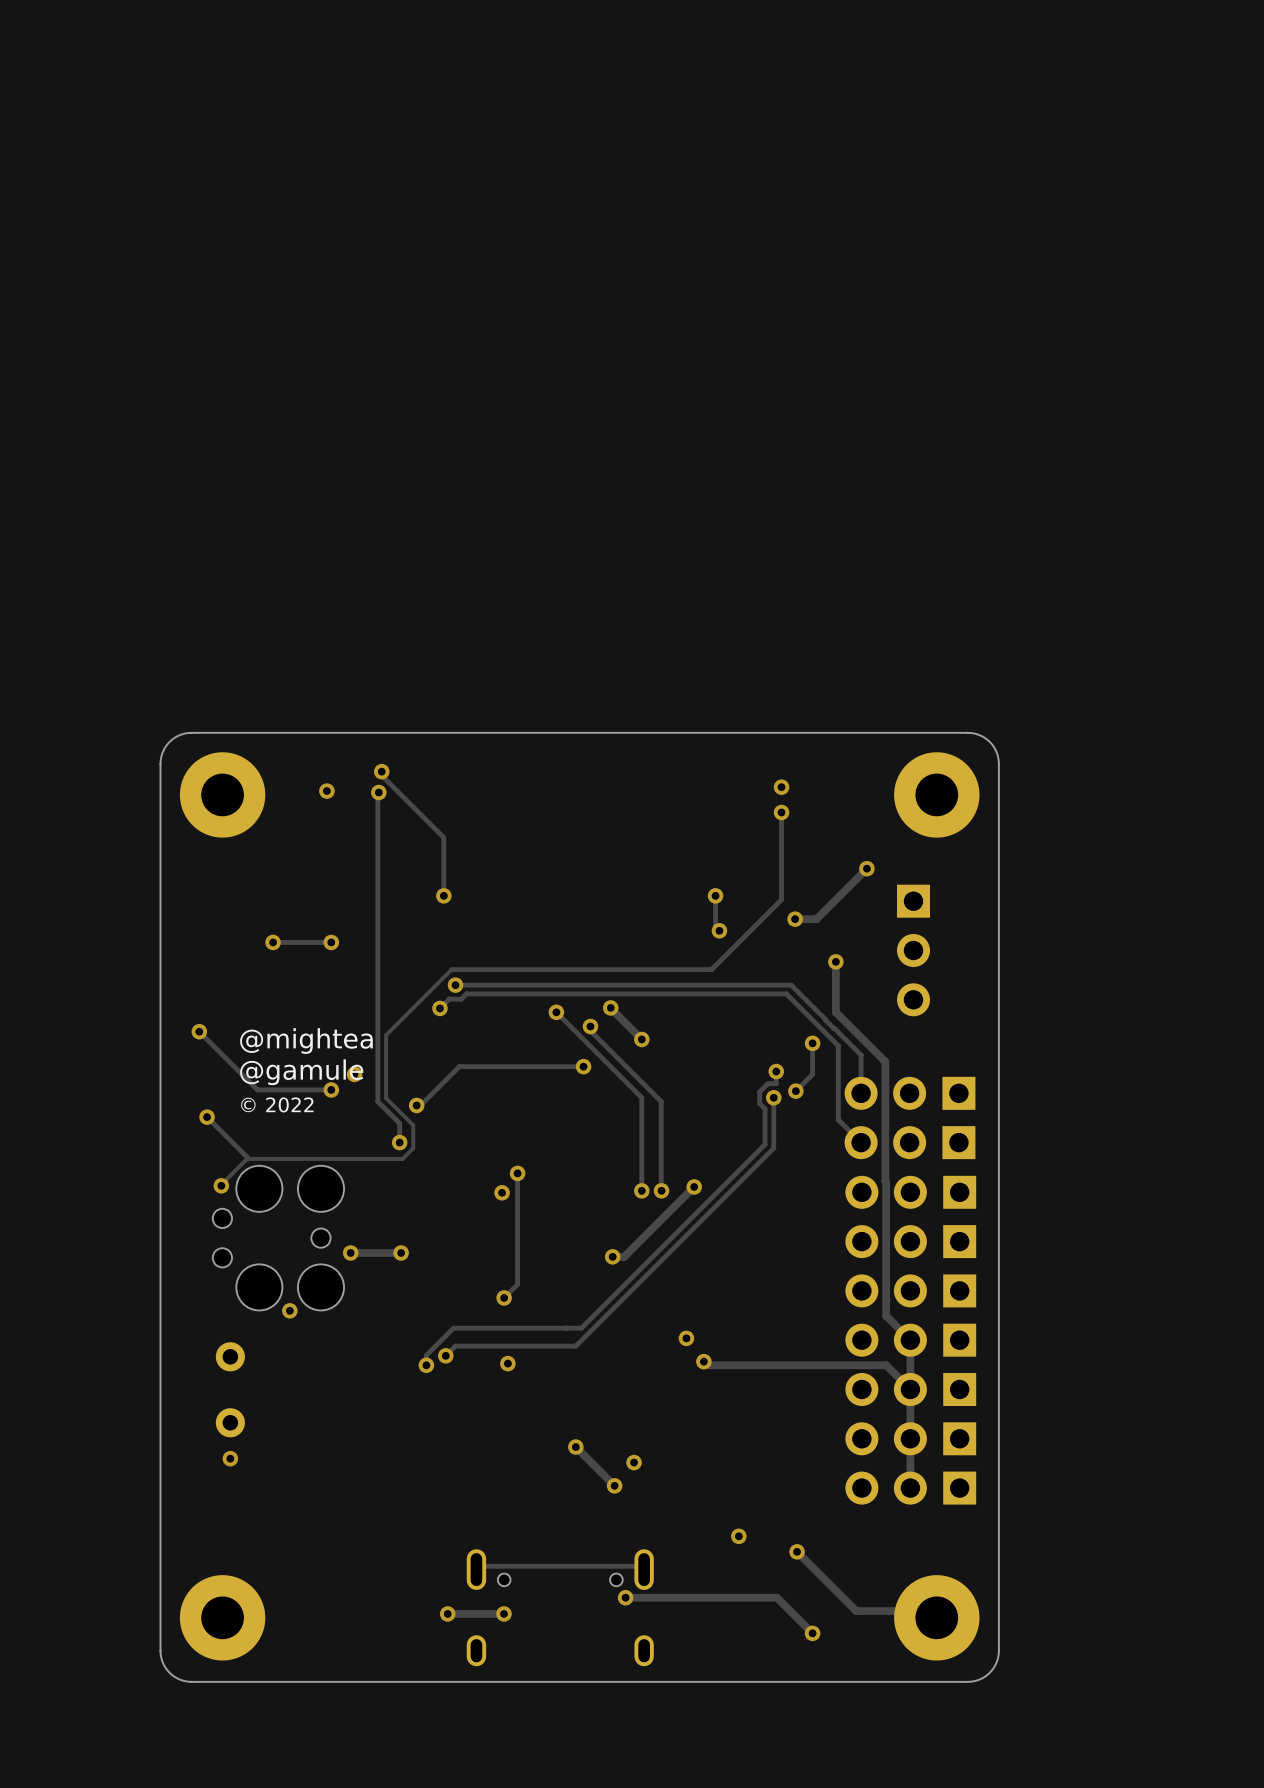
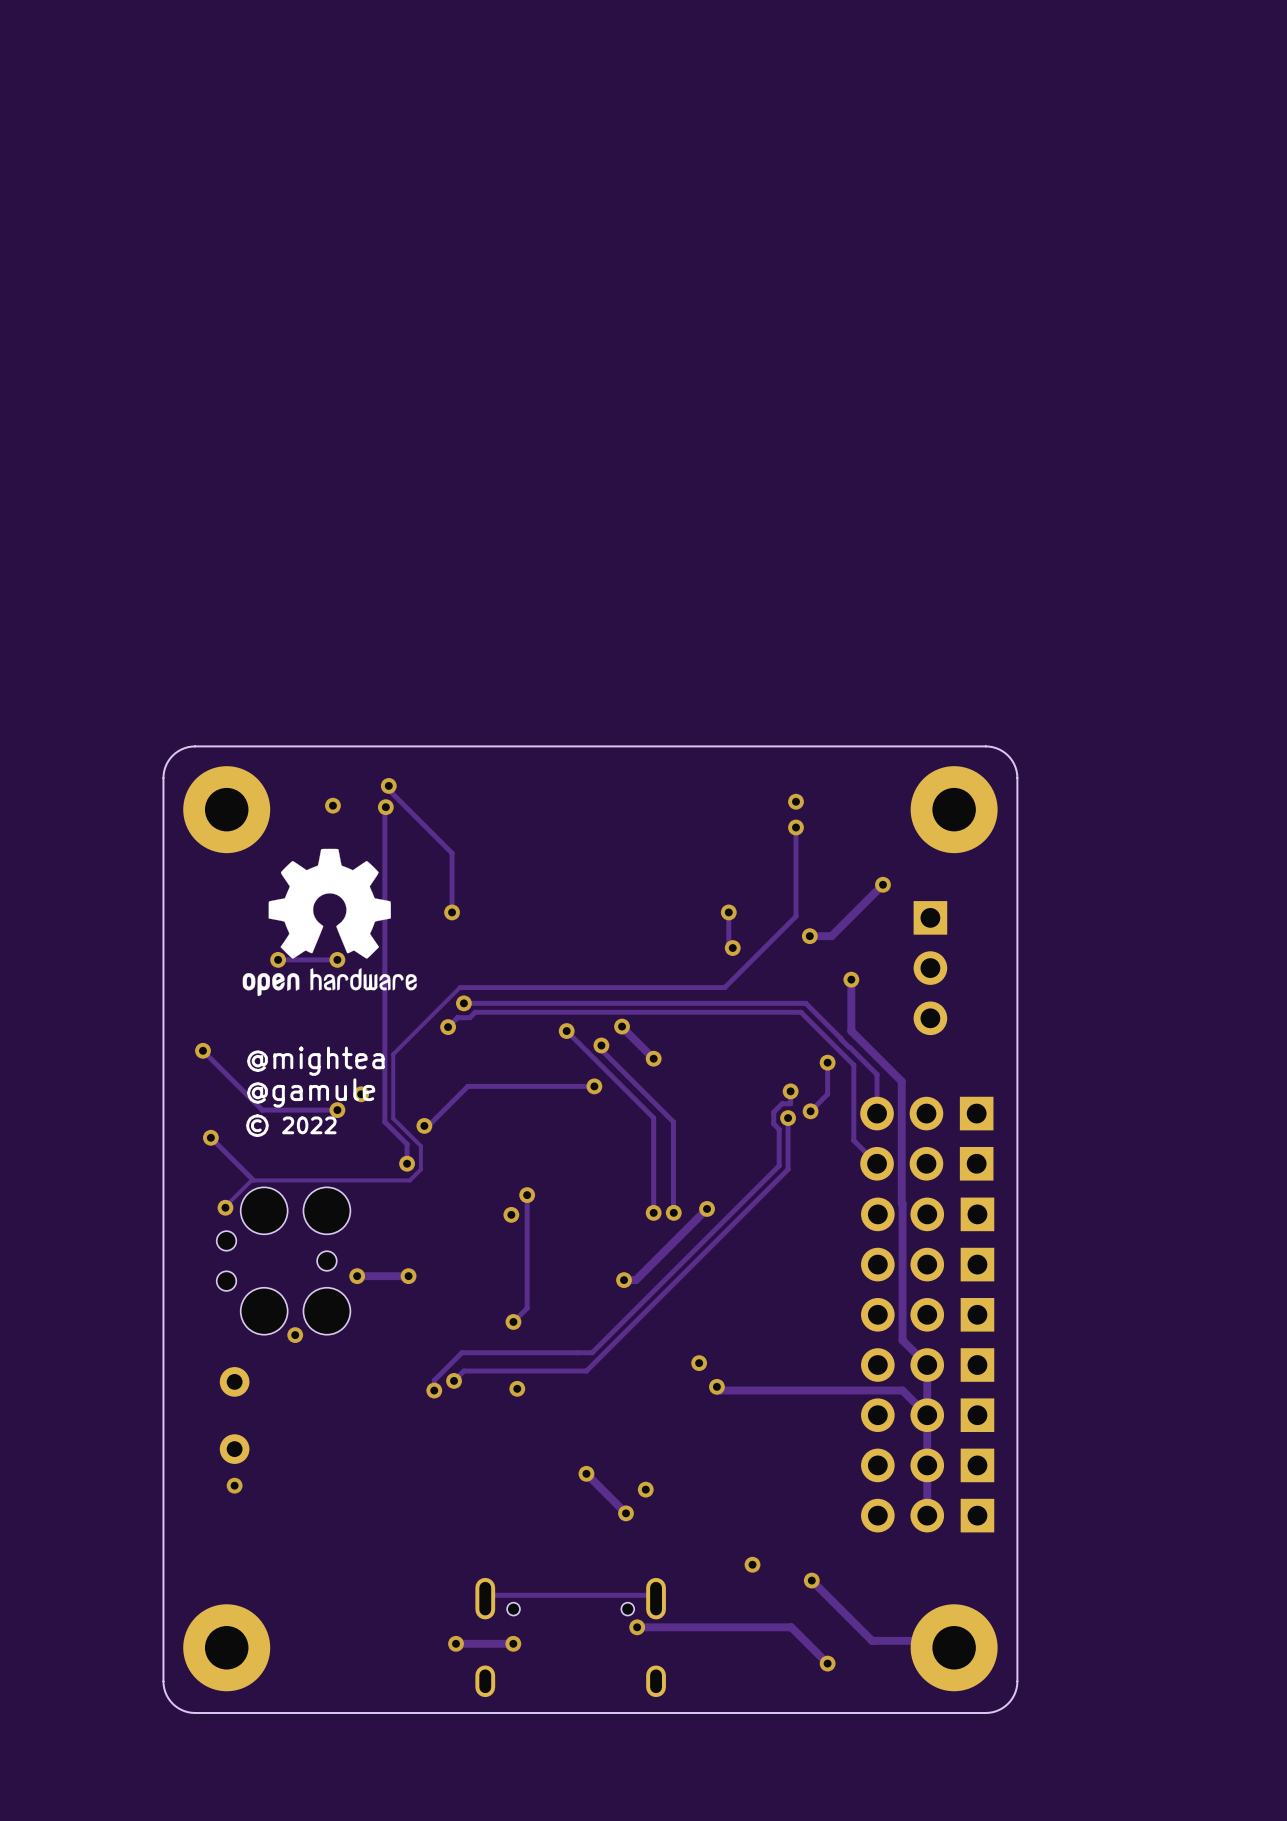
drawing: none -> [242, 848, 417, 997]

